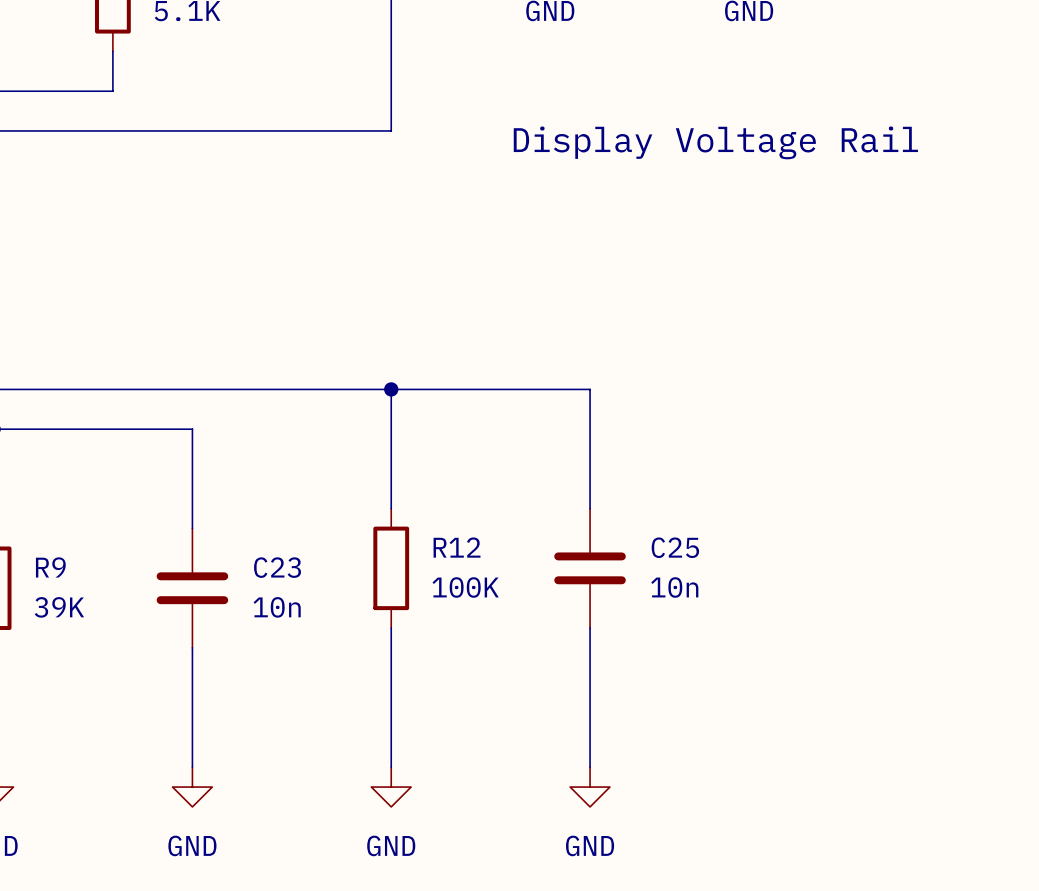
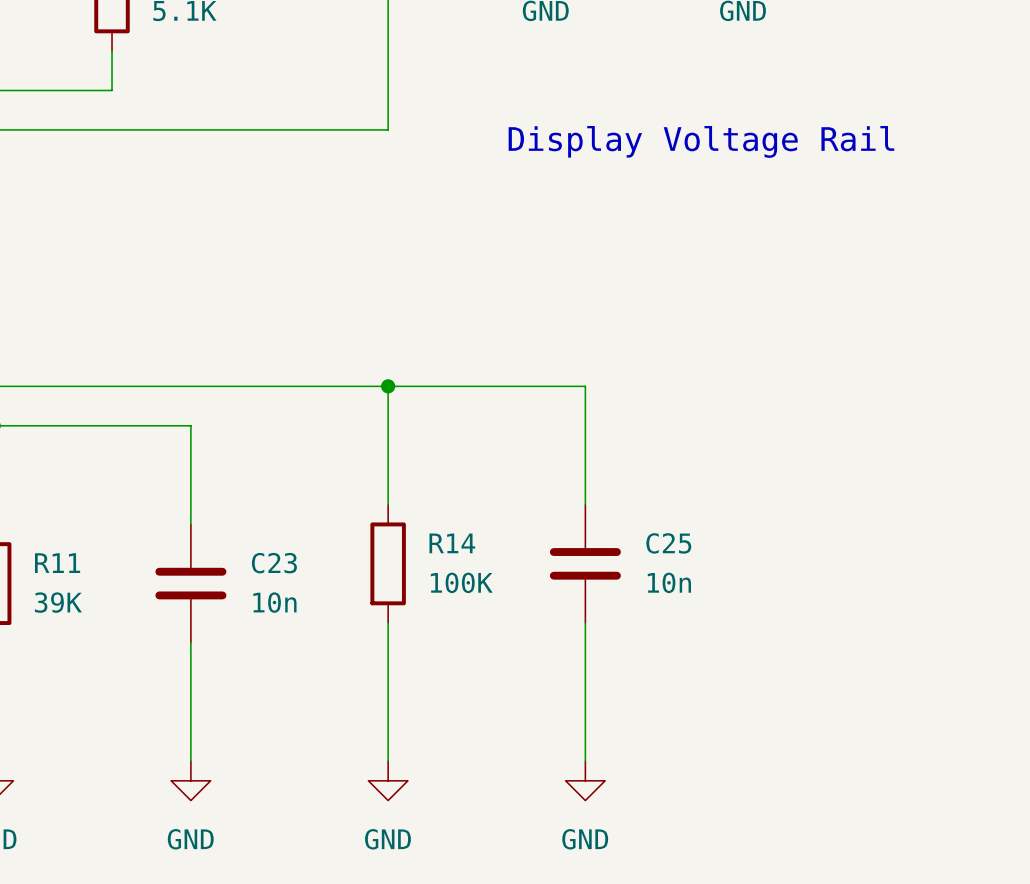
R12 name: R12 (457, 547) -> R14 (452, 543)
R9 name: R9 (50, 567) -> R11 (57, 563)

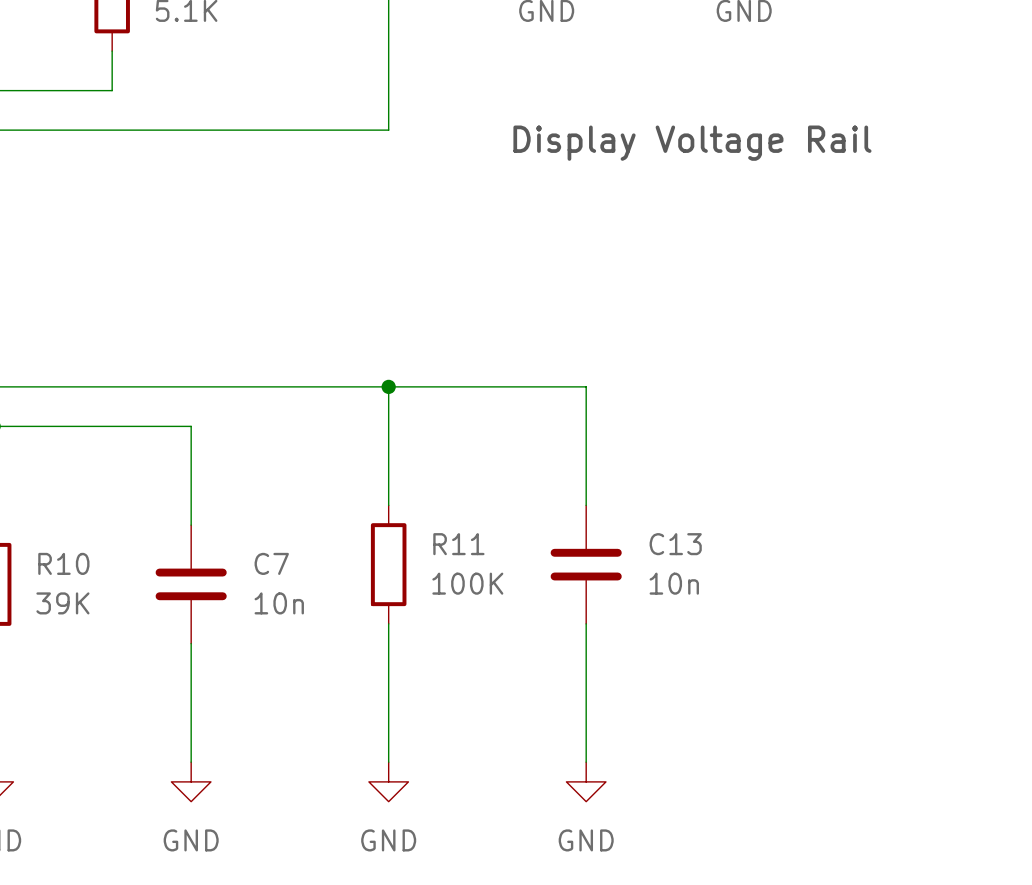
R14 name: R14 (452, 543) -> R11 (458, 544)
C25 name: C25 (668, 543) -> C13 (675, 544)
R11 name: R11 (57, 563) -> R10 (63, 563)
C23 name: C23 (274, 563) -> C7 (271, 563)

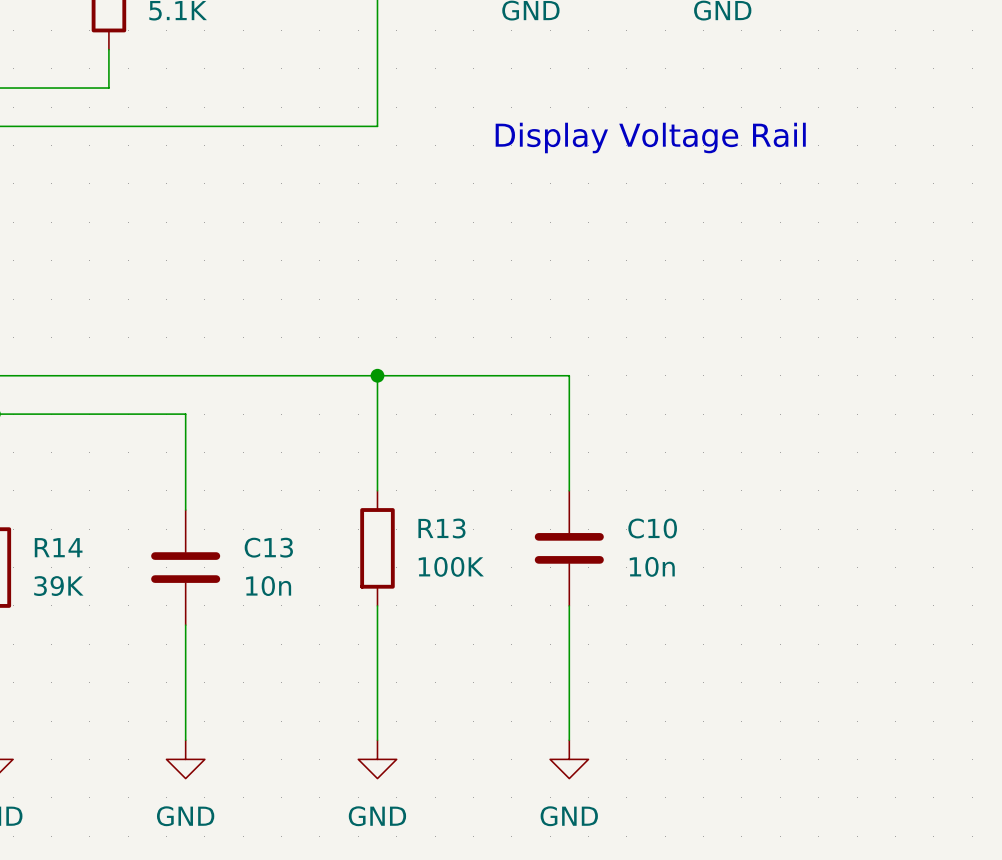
R11 name: R11 (458, 544) -> R13 (441, 528)
C13 name: C13 (675, 544) -> C10 (652, 528)
R10 name: R10 (63, 563) -> R14 (58, 547)
C7 name: C7 (271, 563) -> C13 (268, 547)

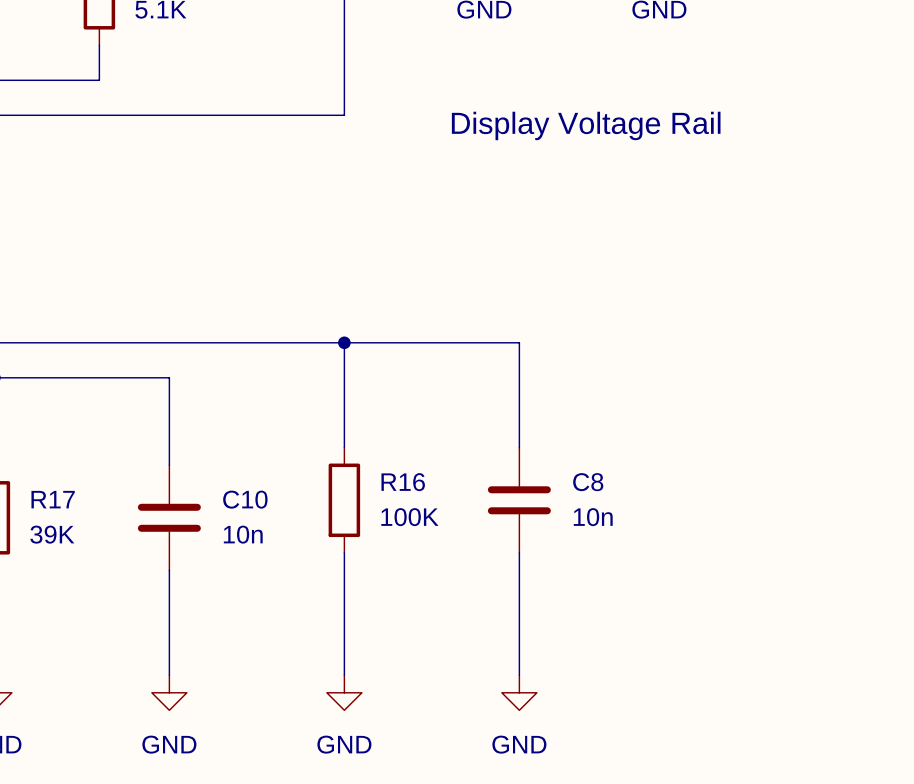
R13 name: R13 (441, 528) -> R16 (403, 482)
C10 name: C10 (652, 528) -> C8 (588, 482)
R14 name: R14 (58, 547) -> R17 (53, 499)
C13 name: C13 (268, 547) -> C10 (245, 499)

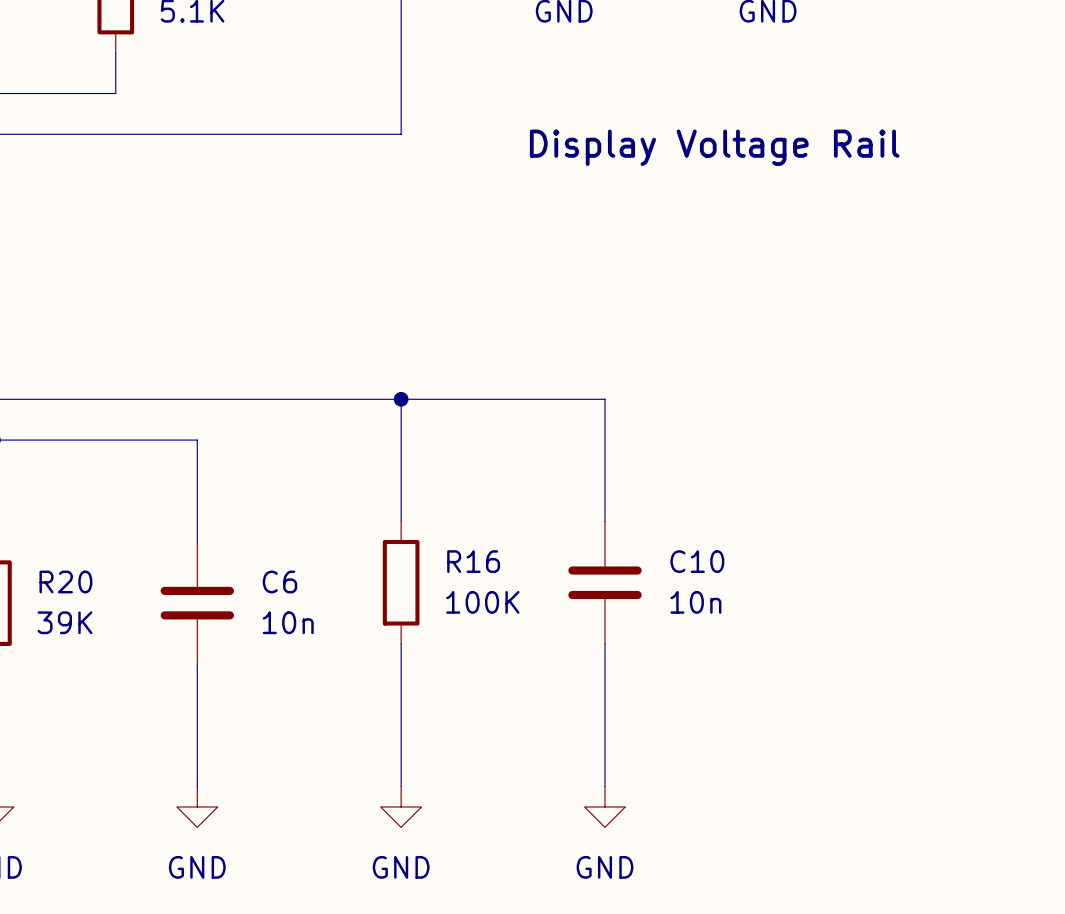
C8 name: C8 (588, 482) -> C10 (697, 561)
R17 name: R17 (53, 499) -> R20 (65, 581)
C10 name: C10 (245, 499) -> C6 (279, 581)

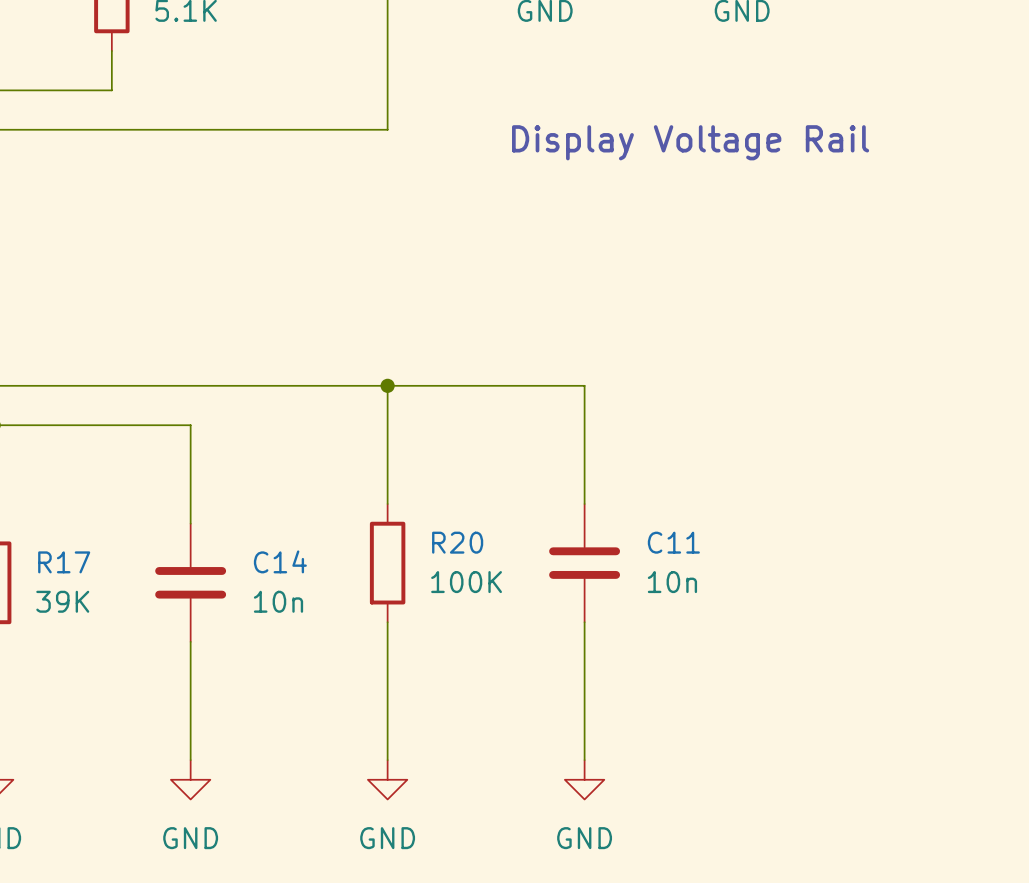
R16 name: R16 (473, 561) -> R20 (457, 542)
C10 name: C10 (697, 561) -> C11 (673, 542)
R20 name: R20 (65, 581) -> R17 (64, 562)
C6 name: C6 (279, 581) -> C14 (280, 561)

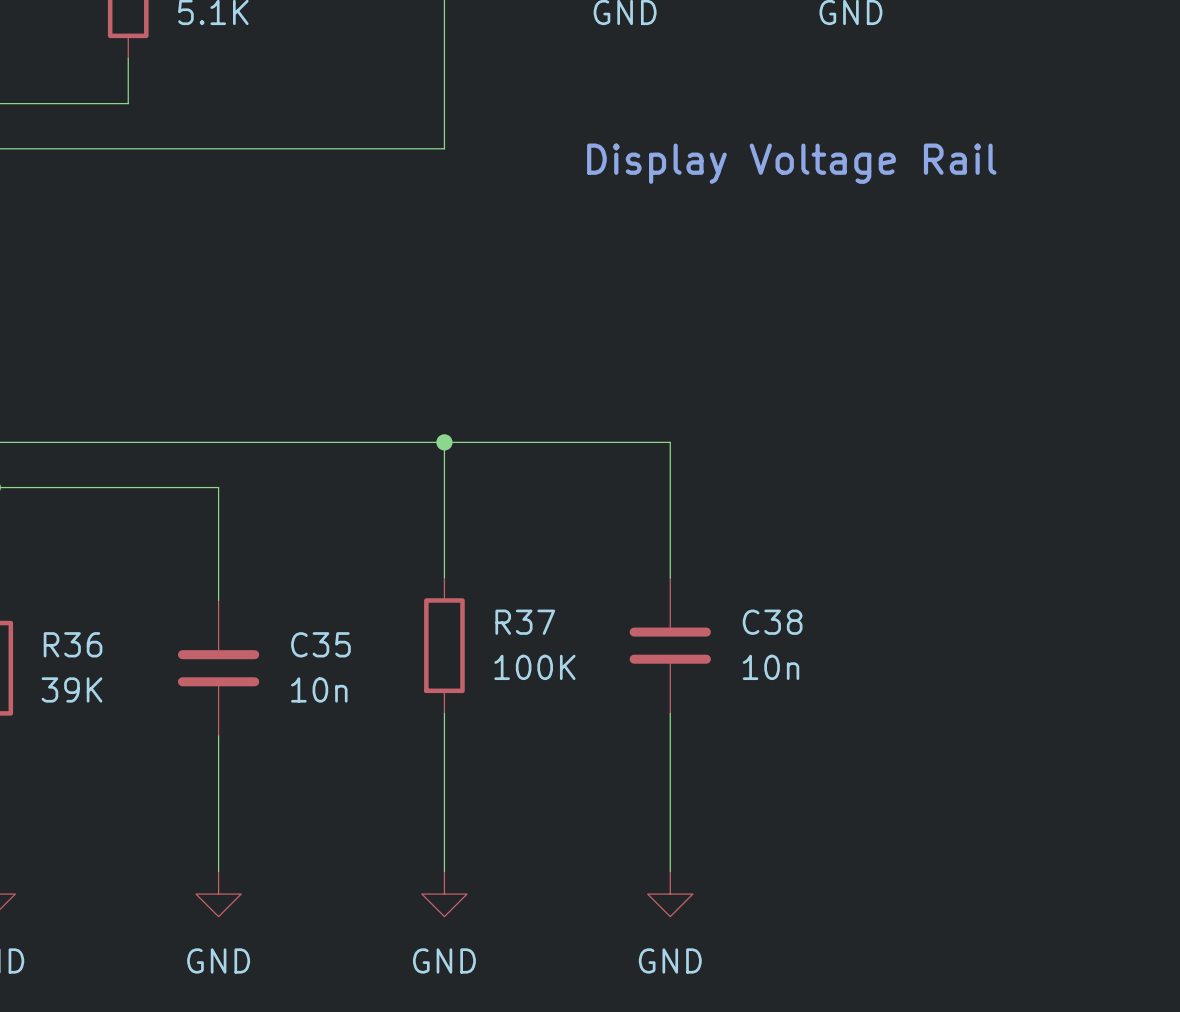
R20 name: R20 (457, 542) -> R37 (525, 622)
C11 name: C11 (673, 542) -> C38 (772, 622)
C14 name: C14 (280, 561) -> C35 (320, 644)
R17 name: R17 (64, 562) -> R36 (73, 644)

